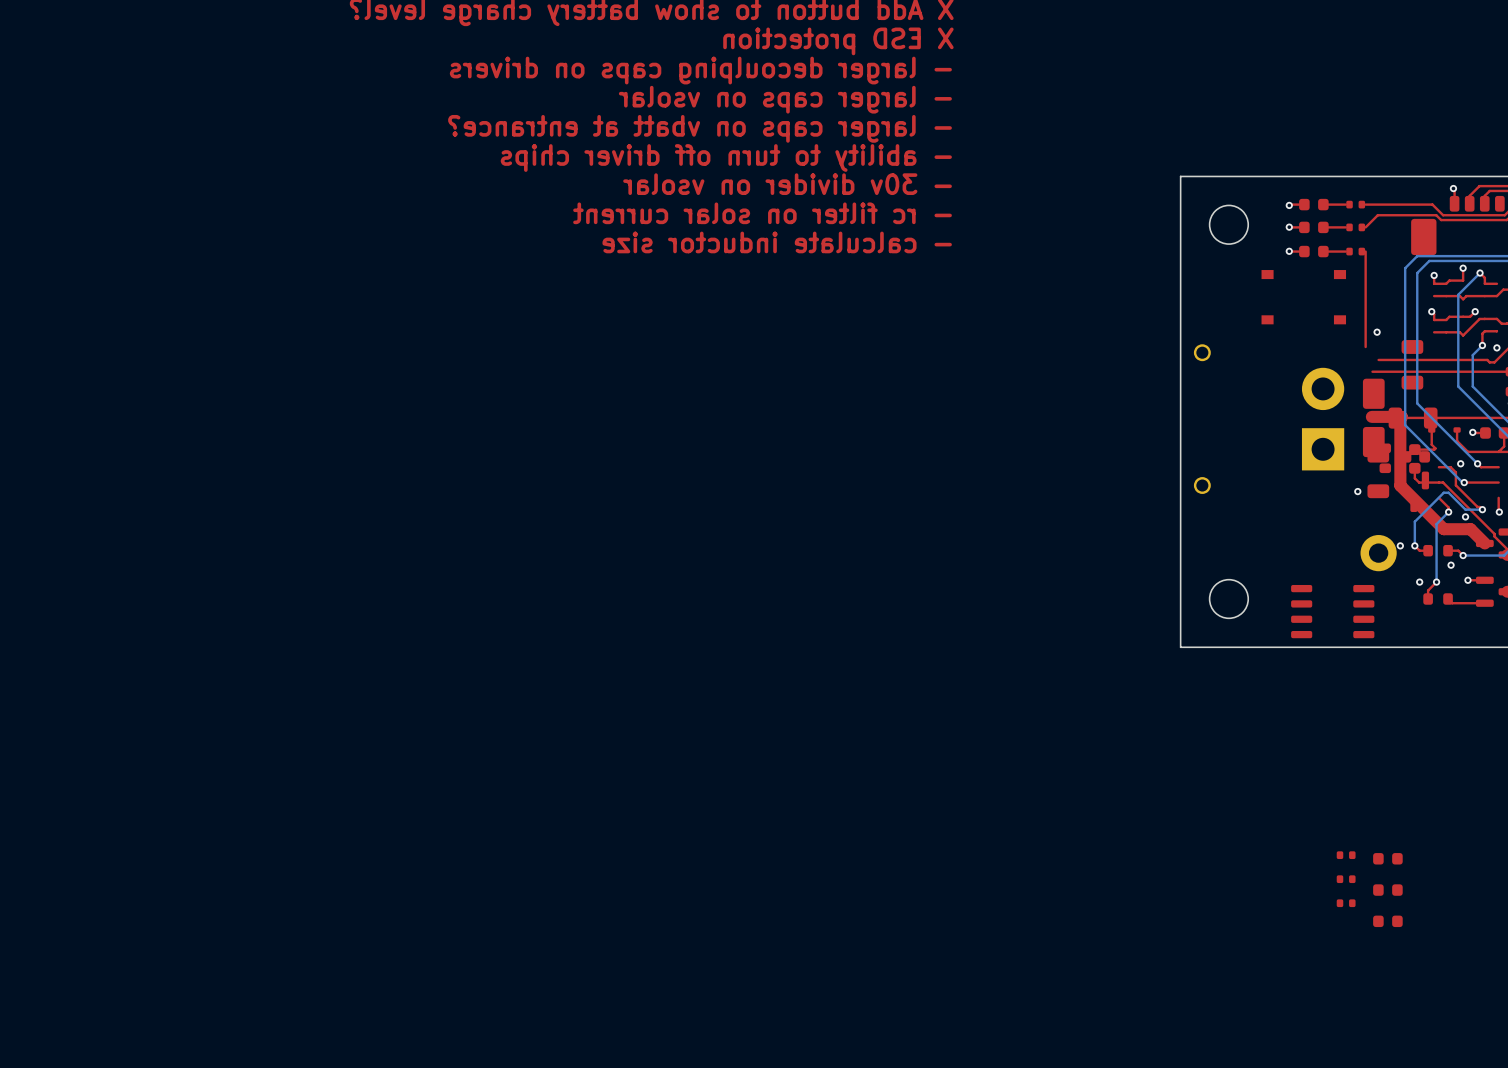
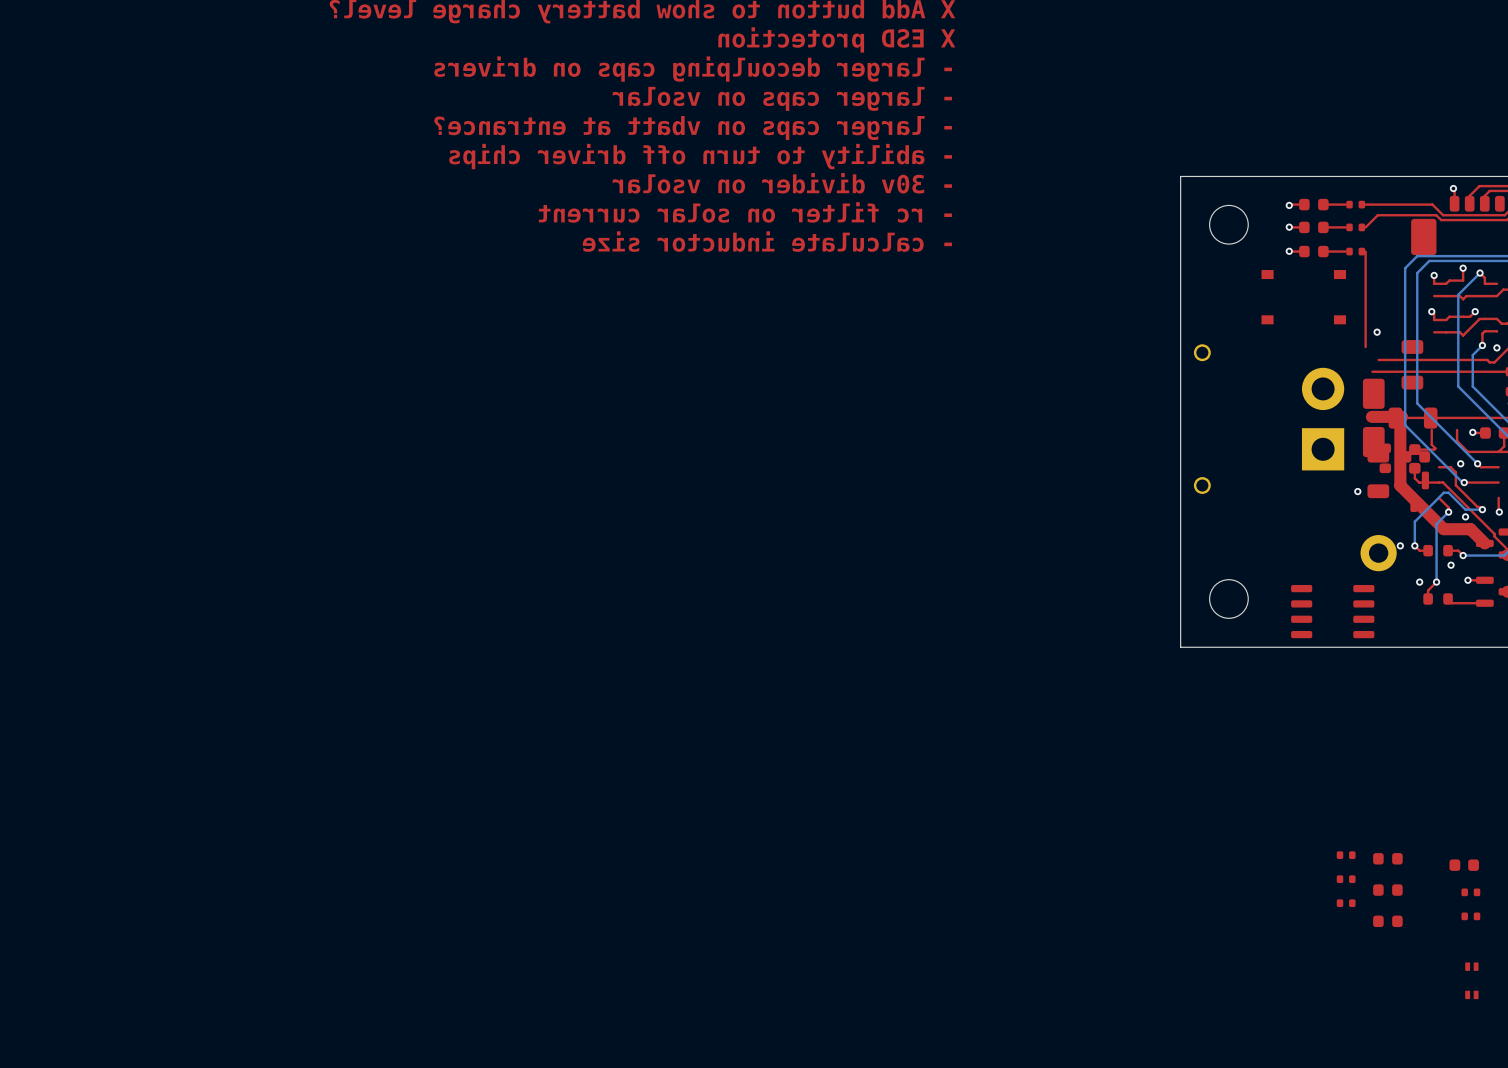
part: (1444, 429) -> none
part: none -> (1464, 865)
part: none -> (1470, 892)
part: none -> (1470, 916)
part: none -> (1471, 966)
part: none -> (1471, 994)

